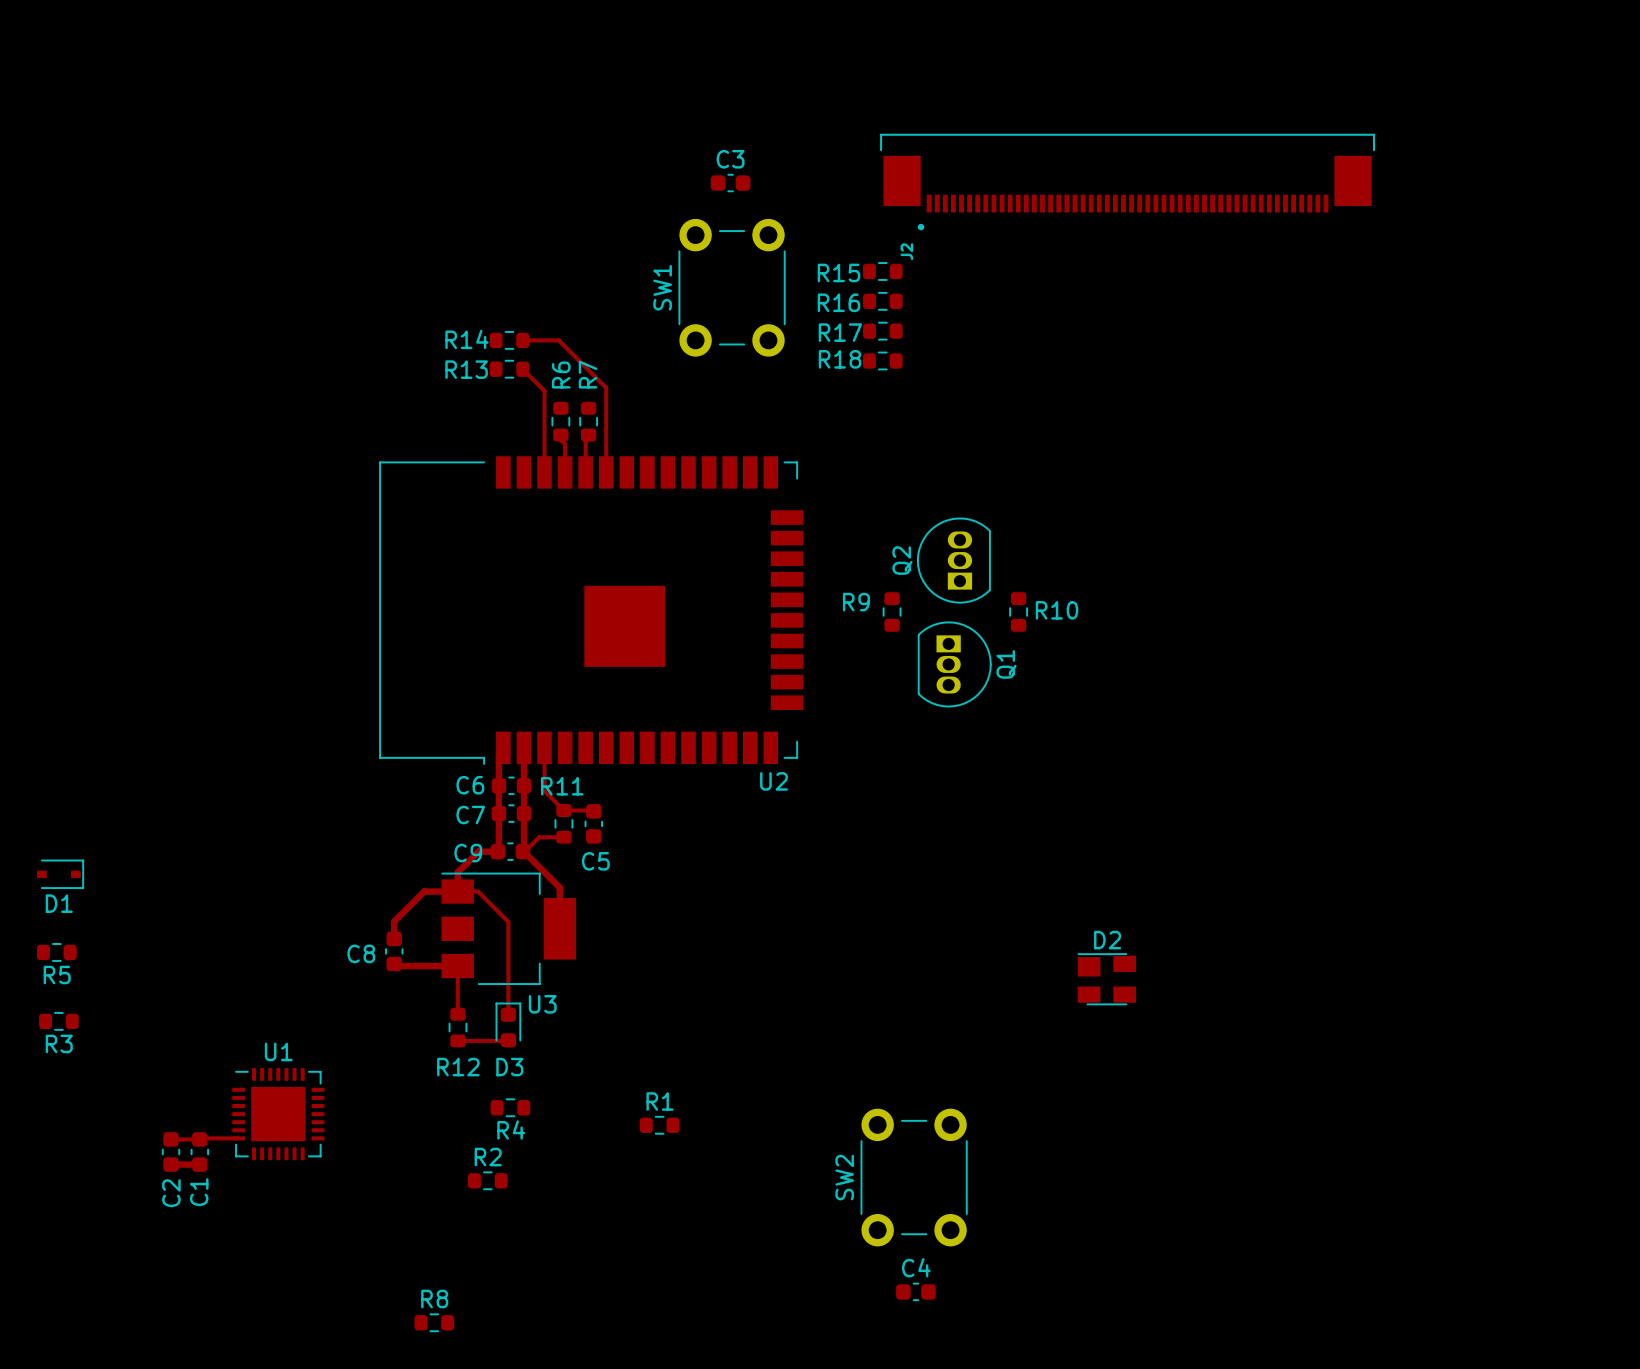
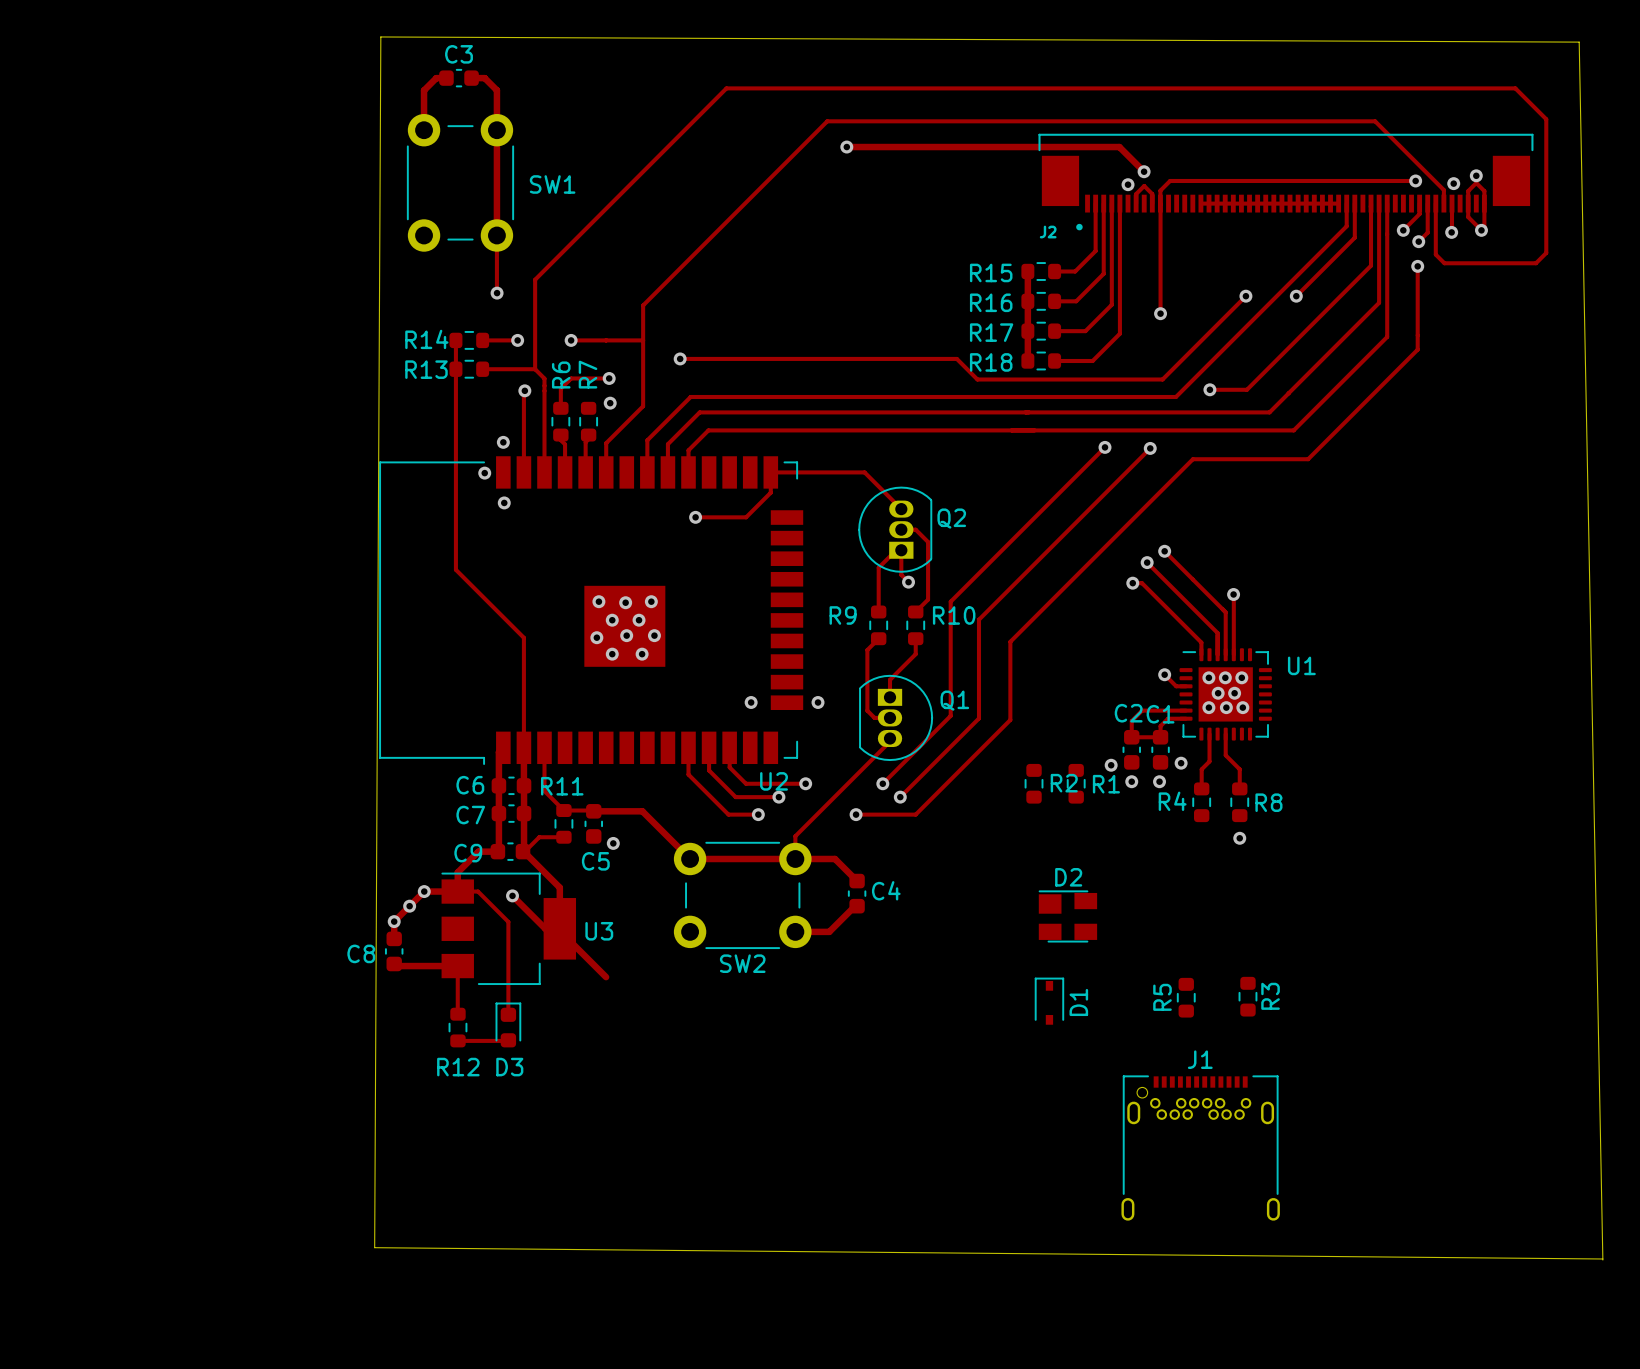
track: none -> (446, 78) (436, 78) (424, 90) (424, 130)
track: none -> (471, 78) (484, 78) (496, 90) (496, 292)
track: none -> (846, 147) (1119, 147) (1144, 171)
via: none -> (846, 147)
via: none -> (1144, 171)
via: none -> (1476, 175)
track: none -> (1415, 180) (1170, 180) (1160, 190) (1160, 313)
via: none -> (1415, 180)
J2 position: (1127, 182) -> (1285, 182)
C3 position: (730, 183) -> (459, 78)
via: none -> (1453, 183)
track: none -> (1476, 183) (1468, 191) (1468, 217) (1481, 230) (1484, 227) (1484, 191) (1476, 183)
via: none -> (1128, 184)
track: none -> (1095, 203) (1095, 251) (1075, 271) (1054, 271)
track: none -> (1103, 203) (1103, 273) (1076, 301) (1054, 301)
track: none -> (1111, 203) (1111, 304) (1085, 331) (1054, 331)
track: none -> (1119, 203) (1119, 333) (1092, 360) (1054, 360)
track: none -> (1136, 203) (1136, 194) (1144, 185) (1152, 194) (1152, 203)
track: none -> (1200, 203) (1338, 203)
track: none -> (1346, 203) (1346, 226) (1175, 396) (690, 396) (647, 440) (647, 472)
track: none -> (1354, 203) (1354, 237) (1295, 296)
track: none -> (1371, 203) (1371, 265) (1246, 389) (1209, 389)
track: none -> (1379, 203) (1379, 302) (1269, 412) (699, 412) (667, 444) (667, 472)
track: none -> (1387, 203) (1387, 336) (1293, 430) (708, 430) (688, 450) (688, 472)
track: none -> (1419, 203) (1419, 214) (1403, 230)
track: none -> (1427, 203) (1427, 232) (1418, 241)
track: none -> (1435, 203) (1435, 254) (1444, 263) (1536, 263) (1546, 252) (1546, 119) (1515, 88) (726, 88) (535, 279) (535, 369)
track: none -> (1452, 203) (1451, 232)
via: none -> (1403, 230)
via: none -> (1481, 230)
via: none -> (1451, 232)
via: none -> (1418, 241)
J2 name rotation: 0° (906, 251) -> 90° clockwise (1048, 232)
J2 name position: J2 (906, 251) -> J2 (1048, 232)
track: none -> (1417, 266) (1417, 349) (1308, 459) (1192, 459) (1010, 641) (1010, 719) (915, 814) (856, 814)
via: none -> (1417, 266)
R15 position: (882, 271) -> (1041, 271)
track: none -> (1027, 271) (1027, 360)
R15 name position: R15 (838, 272) -> R15 (991, 272)
SW1 name rotation: 0° (662, 287) -> 90° clockwise (552, 184)
SW1 name position: SW1 (662, 287) -> SW1 (552, 184)
SW1 position: (732, 287) -> (460, 182)
via: none -> (497, 293)
track: none -> (1245, 296) (1162, 379) (977, 379) (956, 358) (680, 358)
via: none -> (1245, 296)
via: none -> (1296, 296)
R16 position: (882, 301) -> (1041, 301)
R16 name position: R16 (838, 302) -> R16 (991, 302)
via: none -> (1160, 313)
R17 position: (882, 331) -> (1041, 331)
R17 name position: R17 (840, 332) -> R17 (991, 332)
track: none -> (455, 340) (455, 569) (523, 637) (523, 747)
track: none -> (482, 340) (517, 340)
R14 position: (509, 340) -> (469, 340)
via: none -> (517, 340)
track: (522, 340) (558, 340) (606, 387) (606, 443) -> (1443, 203) (1443, 190) (1375, 121) (827, 121) (643, 305) (643, 406) (606, 443)
track: none -> (571, 340) (643, 340)
via: none -> (571, 340)
via: none -> (680, 358)
R18 name position: R18 (839, 359) -> R18 (991, 362)
R18 position: (882, 360) -> (1041, 360)
track: none -> (482, 369) (535, 369)
R13 position: (509, 369) -> (469, 369)
track: (522, 369) (544, 390) -> (535, 369) (544, 378) (544, 390)
track: none -> (609, 378) (571, 378) (560, 388) (560, 408)
via: none -> (609, 378)
via: none -> (1209, 389)
track: none -> (524, 390) (523, 472)
via: none -> (524, 390)
via: none -> (610, 403)
via: none -> (503, 442)
track: none -> (1105, 447) (950, 601) (950, 715) (882, 783)
via: none -> (1105, 447)
track: none -> (1150, 448) (978, 619) (978, 718) (900, 797)
via: none -> (1150, 448)
track: none -> (770, 472) (864, 472) (901, 509)
track: none -> (770, 472) (770, 492) (746, 517) (695, 517)
via: none -> (484, 473)
via: none -> (504, 502)
via: none -> (695, 517)
track: none -> (901, 529) (915, 529) (928, 542) (928, 599) (915, 611)
track: none -> (1164, 551) (1225, 612) (1225, 654)
via: none -> (1164, 551)
Q2 name rotation: 0° (902, 560) -> 90° clockwise (951, 518)
Q2 name position: Q2 (902, 560) -> Q2 (951, 518)
Q2 position: (953, 560) -> (895, 529)
track: none -> (1147, 562) (1217, 633) (1217, 654)
via: none -> (1147, 562)
track: none -> (908, 582) (901, 574) (901, 550) (896, 550) (878, 567) (878, 611)
via: none -> (908, 582)
track: none -> (1132, 583) (1142, 583) (1201, 642) (1201, 654)
via: none -> (1132, 583)
track: none -> (1233, 594) (1233, 654)
via: none -> (1233, 594)
via: none -> (598, 601)
via: none -> (651, 601)
via: none -> (625, 602)
R10 name position: R10 (1057, 610) -> R10 (954, 615)
R9 position: (892, 611) -> (878, 625)
R10 position: (1018, 611) -> (915, 625)
via: none -> (612, 620)
via: none -> (639, 620)
via: none -> (626, 635)
via: none -> (654, 635)
via: none -> (596, 637)
track: none -> (878, 638) (867, 650) (867, 710) (874, 717) (890, 717)
track: none -> (915, 638) (915, 654) (890, 679) (890, 697)
via: none -> (612, 654)
via: none -> (642, 654)
Q1 position: (954, 664) -> (896, 717)
Q1 name rotation: 0° (1006, 664) -> 90° clockwise (954, 700)
track: none -> (1164, 674) (1176, 686) (1186, 686)
via: none -> (1164, 674)
via: none -> (1208, 677)
via: none -> (1225, 677)
via: none -> (1241, 677)
via: none -> (1218, 693)
via: none -> (1234, 693)
via: none -> (751, 702)
via: none -> (818, 702)
via: none -> (1208, 707)
via: none -> (1226, 707)
via: none -> (1242, 707)
track: none -> (1186, 710) (1142, 710) (1131, 721) (1131, 737) (1160, 737)
track: none -> (1186, 718) (1168, 718) (1160, 726) (1160, 737)
track: none -> (1209, 734) (1209, 761) (1201, 769) (1201, 788)
track: none -> (1225, 734) (1225, 755) (1239, 769) (1239, 788)
track: none -> (890, 738) (890, 741) (795, 836) (795, 858)
track: none -> (688, 747) (688, 774) (728, 814) (758, 814)
track: none -> (709, 747) (709, 770) (735, 797) (778, 797)
track: none -> (729, 747) (729, 767) (746, 783) (805, 783)
via: none -> (1181, 763)
via: none -> (1111, 765)
via: none -> (1131, 781)
via: none -> (1159, 781)
via: none -> (805, 783)
via: none -> (882, 783)
via: none -> (778, 797)
via: none -> (900, 797)
track: none -> (593, 811) (642, 811) (690, 858) (835, 858) (857, 881)
via: none -> (758, 814)
via: none -> (856, 814)
via: none -> (1239, 838)
via: none -> (613, 843)
D1 rotation: 0° (60, 874) -> 90° counterclockwise (1049, 1001)
D1 position: (60, 874) -> (1049, 1001)
via: none -> (424, 891)
track: none -> (512, 895) (545, 928) (559, 928) (606, 977)
via: none -> (512, 895)
via: none -> (409, 906)
track: none -> (857, 906) (829, 931) (795, 931)
via: none -> (394, 921)
R5 rotation: 0° (56, 952) -> 90° clockwise (1186, 997)
R5 position: (56, 952) -> (1186, 997)
D2 position: (1106, 979) -> (1067, 916)
U3 name position: U3 (542, 1004) -> U3 (599, 931)
R3 rotation: 0° (58, 1021) -> 90° clockwise (1247, 996)
R3 position: (58, 1021) -> (1247, 996)
R3 name position: R3 (59, 1043) -> R3 (1270, 996)
U1 name position: U1 (278, 1051) -> U1 (1301, 665)
R4 rotation: 0° (510, 1107) -> 90° clockwise (1201, 802)
R4 position: (510, 1107) -> (1201, 802)
U1 position: (278, 1114) -> (1225, 694)
R1 rotation: 0° (659, 1125) -> 90° clockwise (1076, 783)
R1 position: (659, 1125) -> (1076, 783)
track: (238, 1138) (170, 1139) -> none
J1: none -> (1200, 1148)
C2 position: (170, 1152) -> (1131, 749)
C1 position: (199, 1152) -> (1160, 749)
track: (170, 1164) (199, 1164) -> none
SW2 name position: SW2 (844, 1177) -> SW2 (742, 963)
SW2 rotation: 0° (914, 1177) -> 90° clockwise (742, 895)
SW2 position: (914, 1177) -> (742, 895)
R2 rotation: 0° (487, 1180) -> 90° clockwise (1034, 783)
R2 position: (487, 1180) -> (1034, 783)
C1 name rotation: 0° (199, 1192) -> 90° clockwise (1160, 714)
C1 name position: C1 (199, 1192) -> C1 (1160, 714)
C2 name rotation: 0° (171, 1193) -> 90° clockwise (1128, 713)
C2 name position: C2 (171, 1193) -> C2 (1128, 713)
board edge: none -> (1602, 1258) (374, 1247) (380, 36) (1579, 42) (1602, 1260)
C4 rotation: 0° (915, 1291) -> 90° clockwise (857, 893)
C4 position: (915, 1291) -> (857, 893)
R8 rotation: 0° (434, 1322) -> 90° clockwise (1239, 802)
R8 position: (434, 1322) -> (1239, 802)

